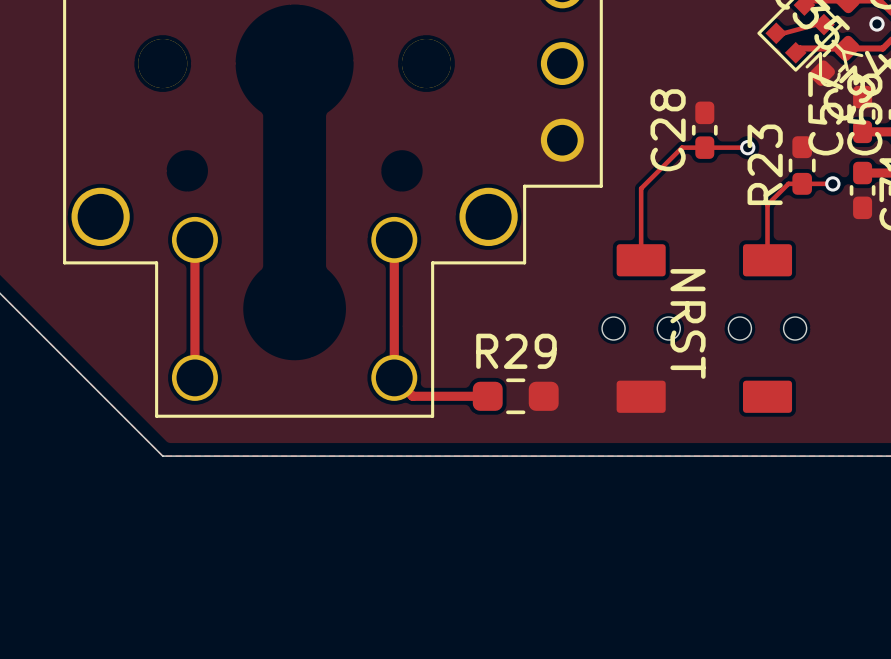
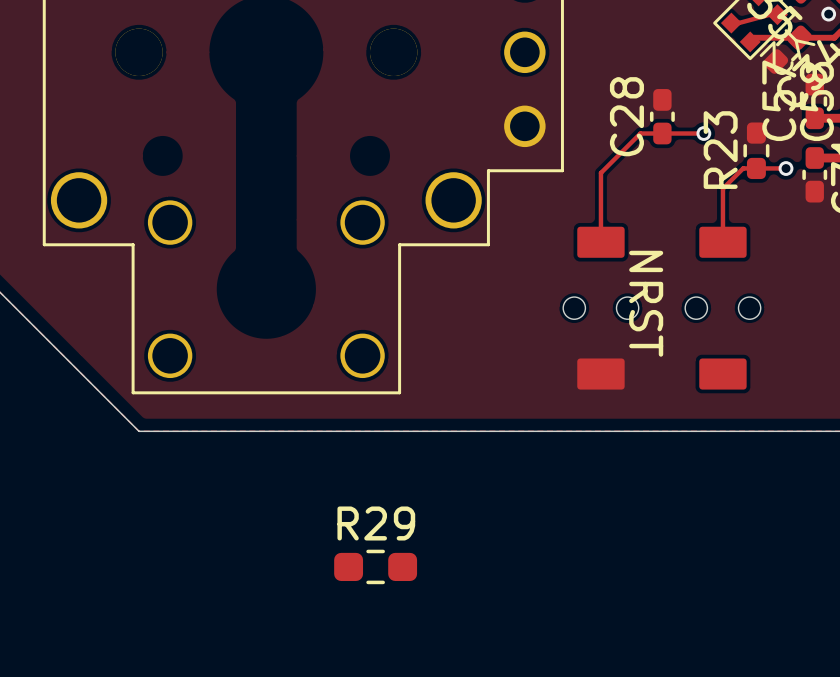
track: (194, 239) (194, 377) -> none
track: (394, 239) (394, 377) (412, 396) (487, 396) -> none
R29 position: (515, 396) -> (375, 566)

